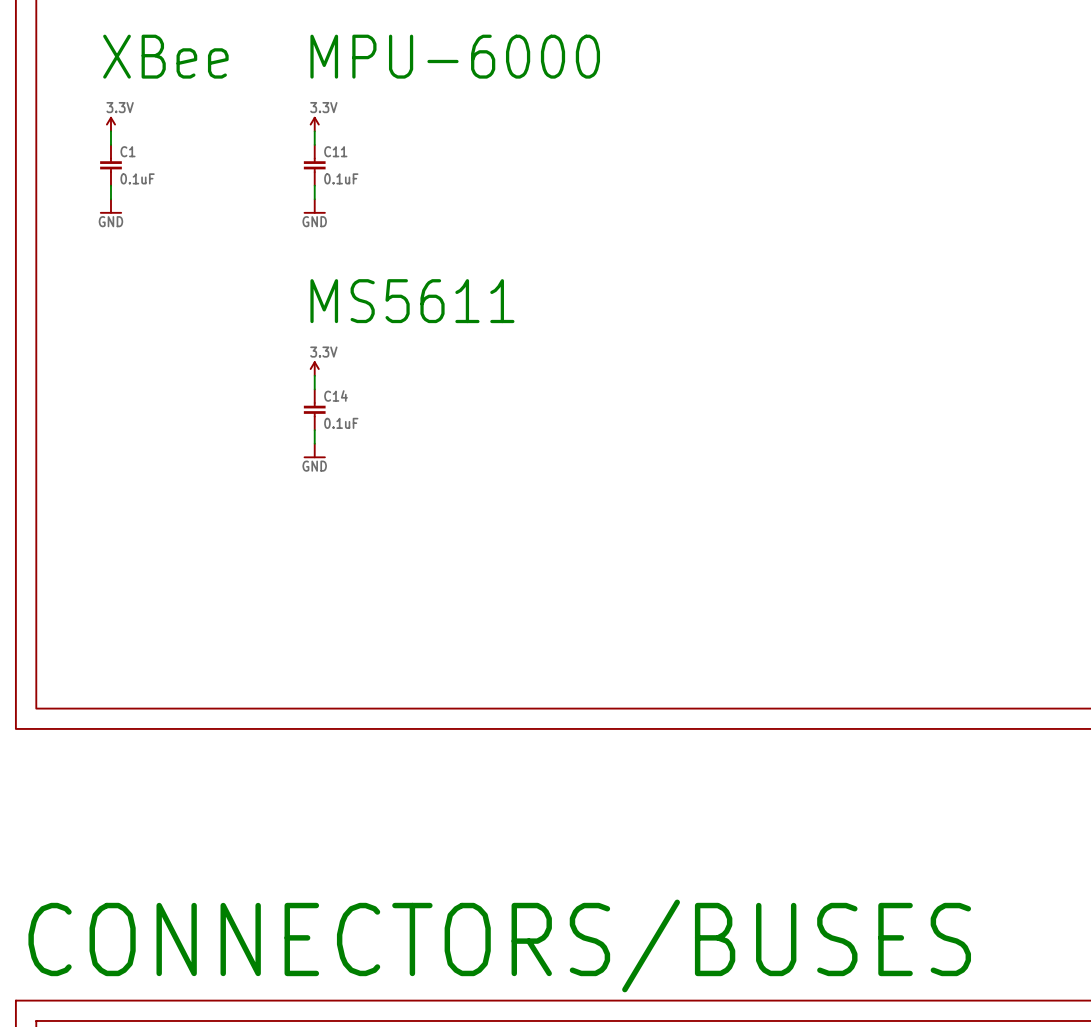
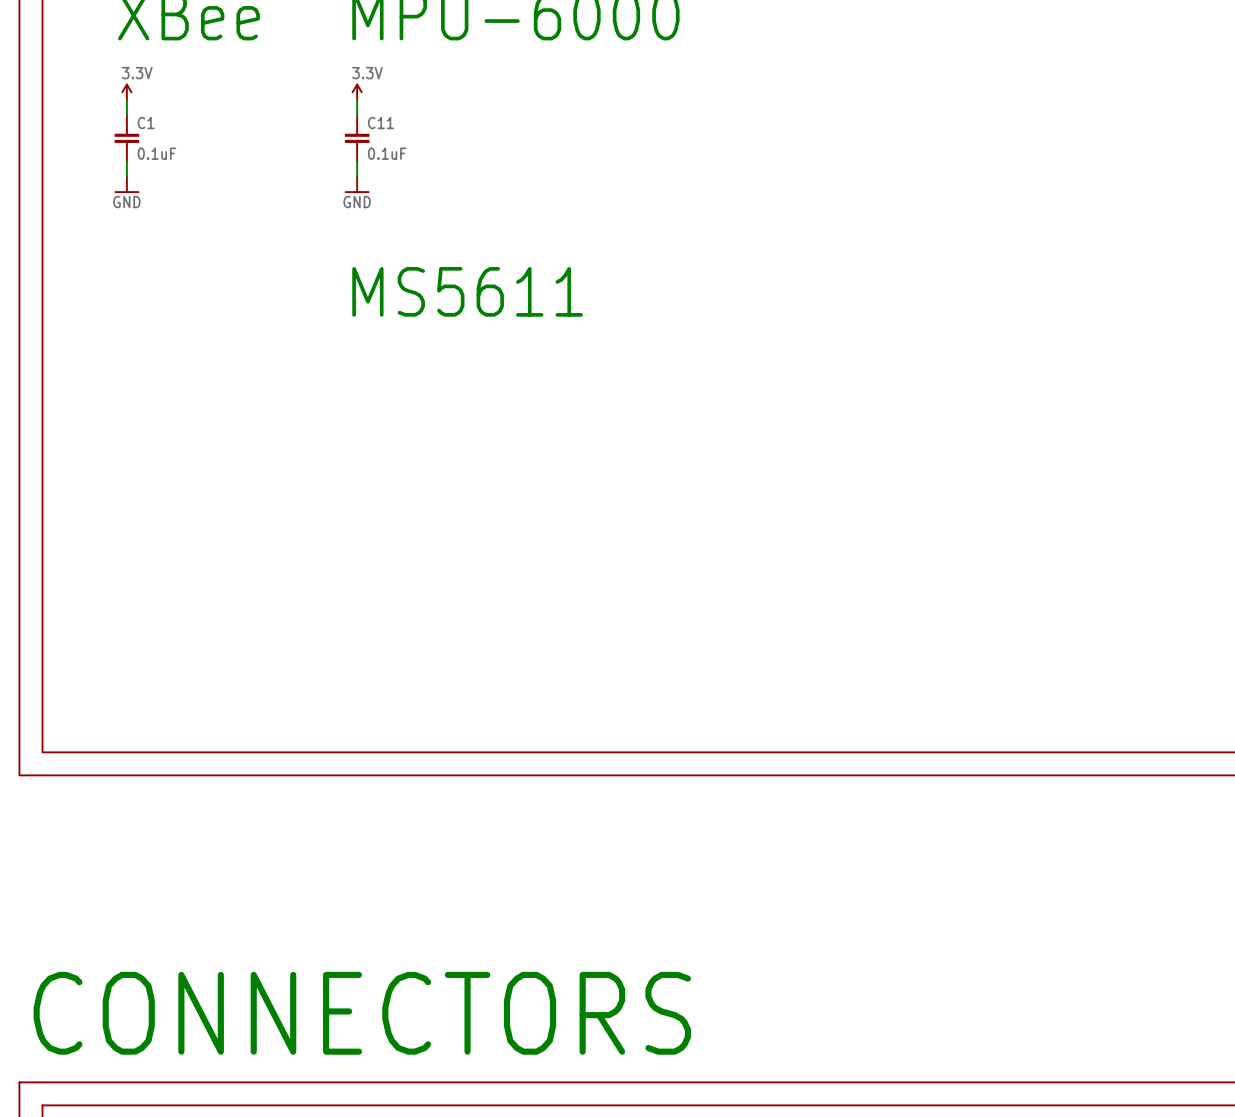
power symbol: 3.3V (314, 368) -> none
wire: (314, 375) (314, 389) -> none
C14: 0.1uF (314, 409) -> none
wire: (314, 430) (314, 443) -> none
power symbol: GND (314, 450) -> none
text: CONNECTORS/BUSES (499, 945) -> CONNECTORS (362, 1013)

